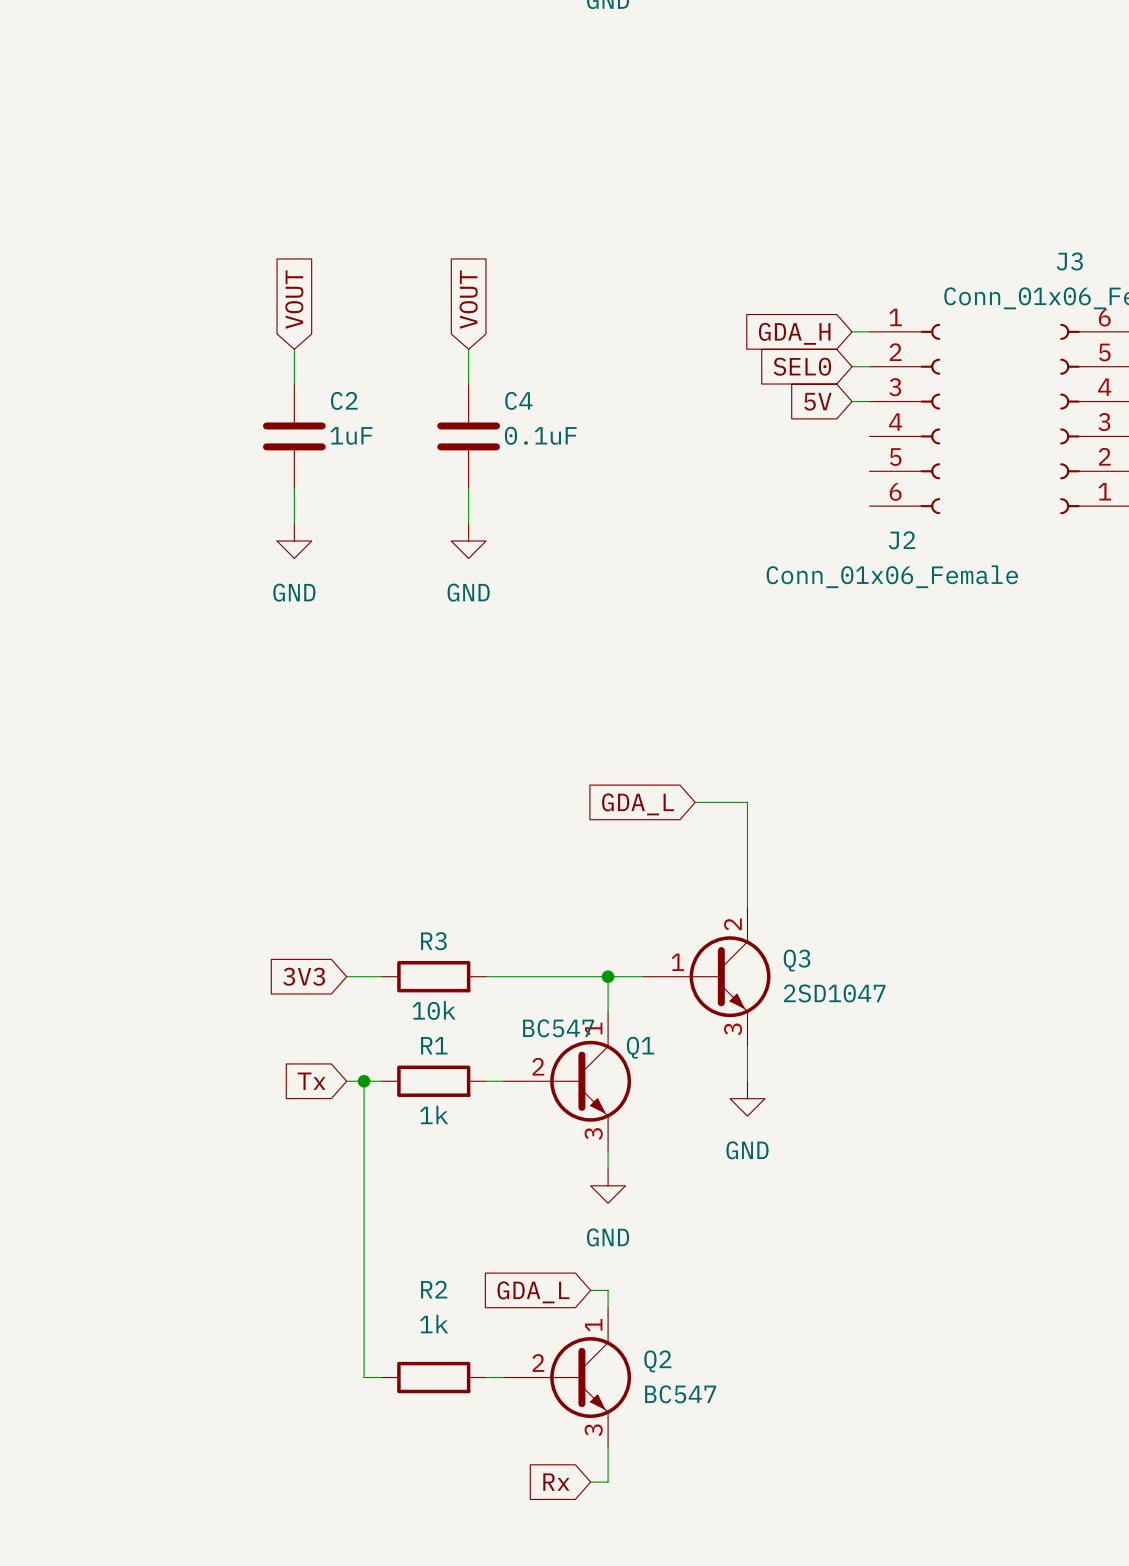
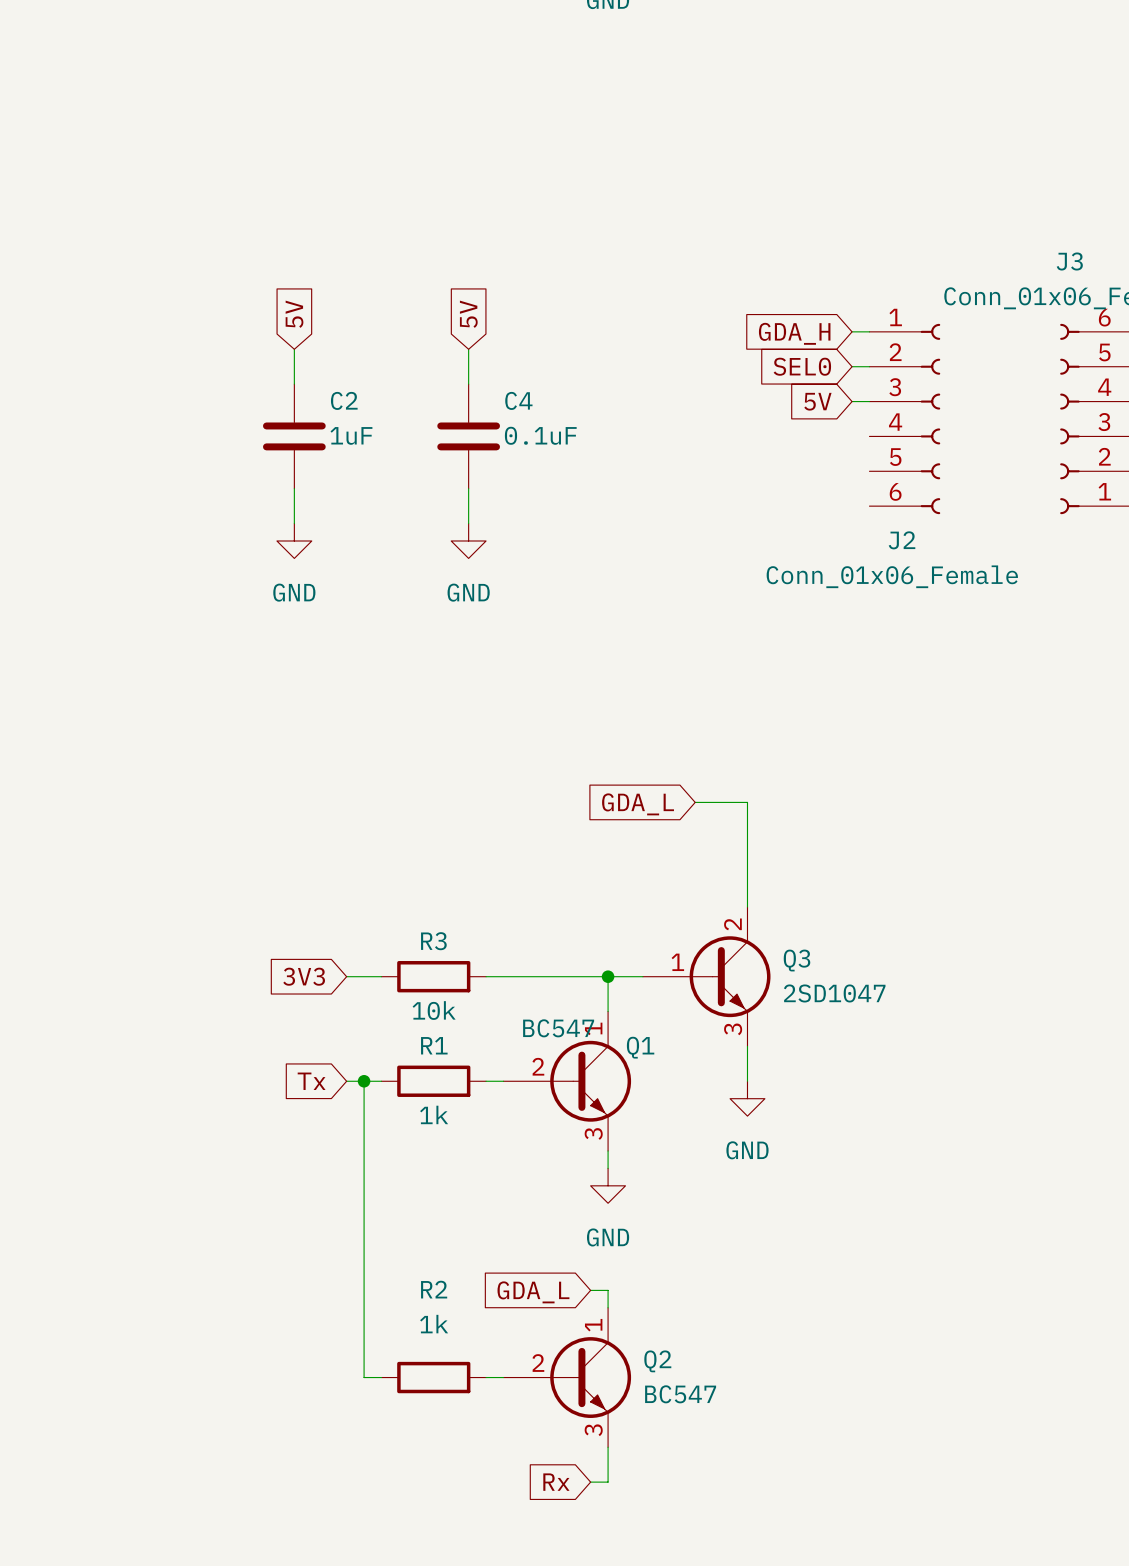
global label: VOUT (294, 299) -> 5V (294, 314)
global label: VOUT (468, 299) -> 5V (468, 314)

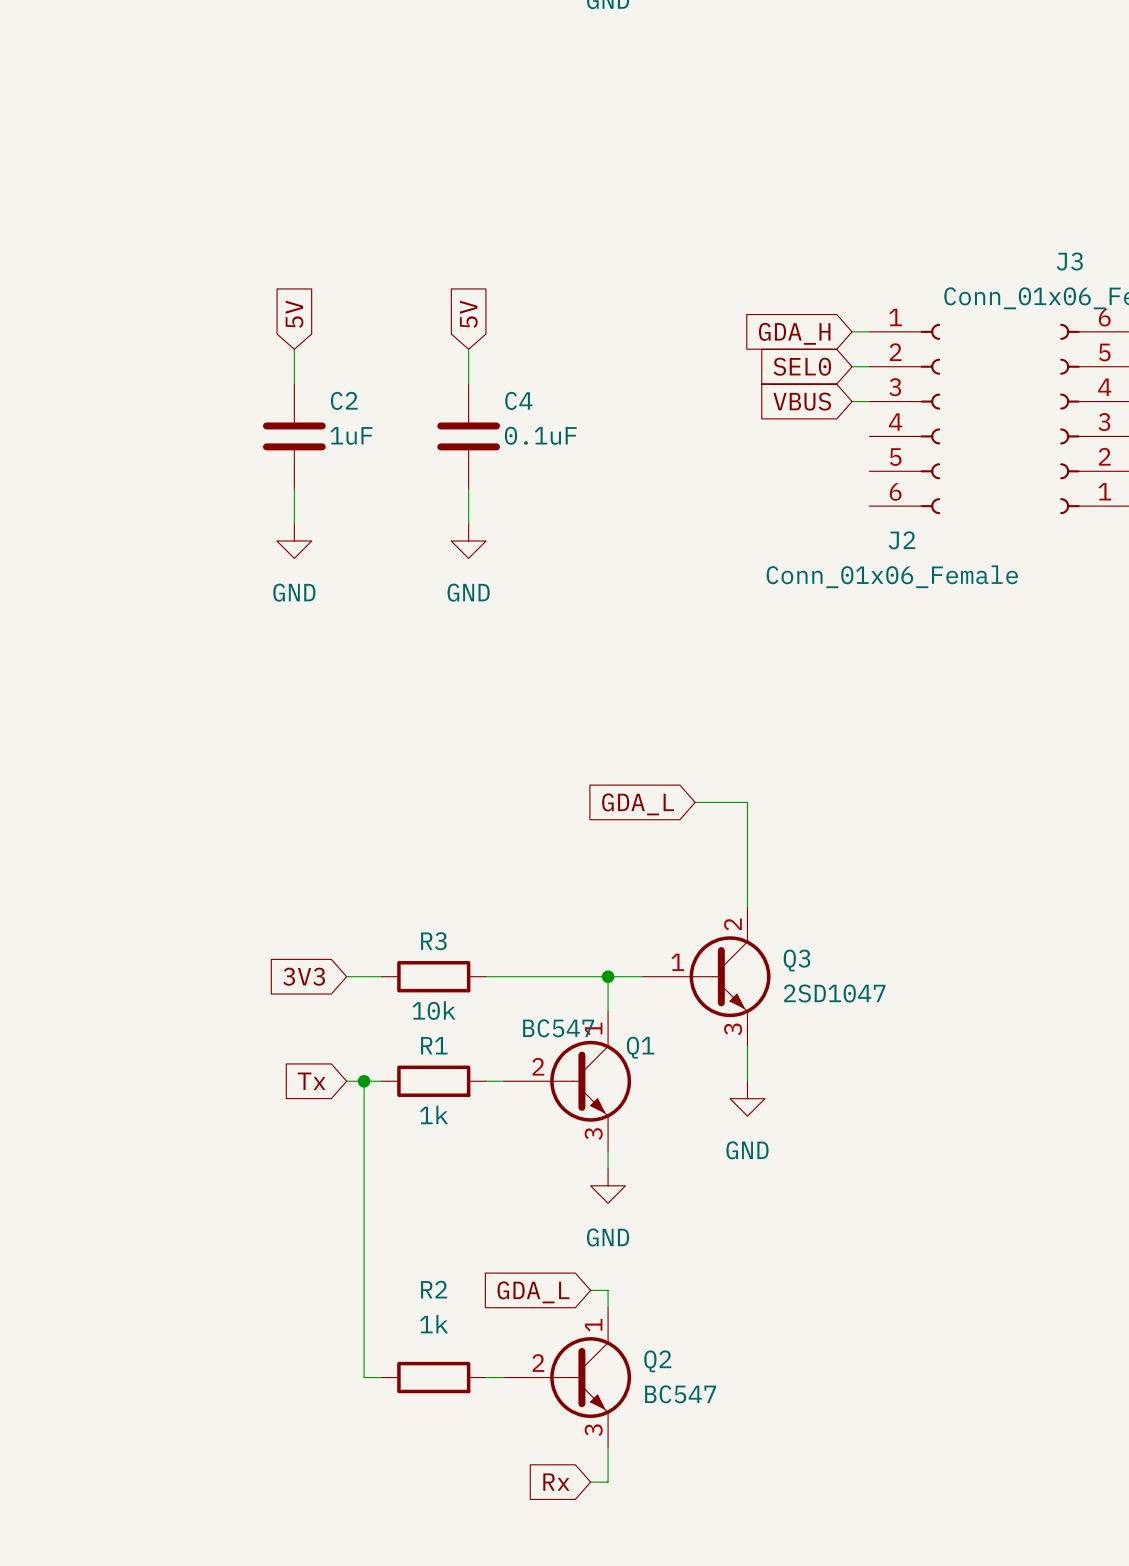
global label: 5V (817, 401) -> VBUS (802, 401)

